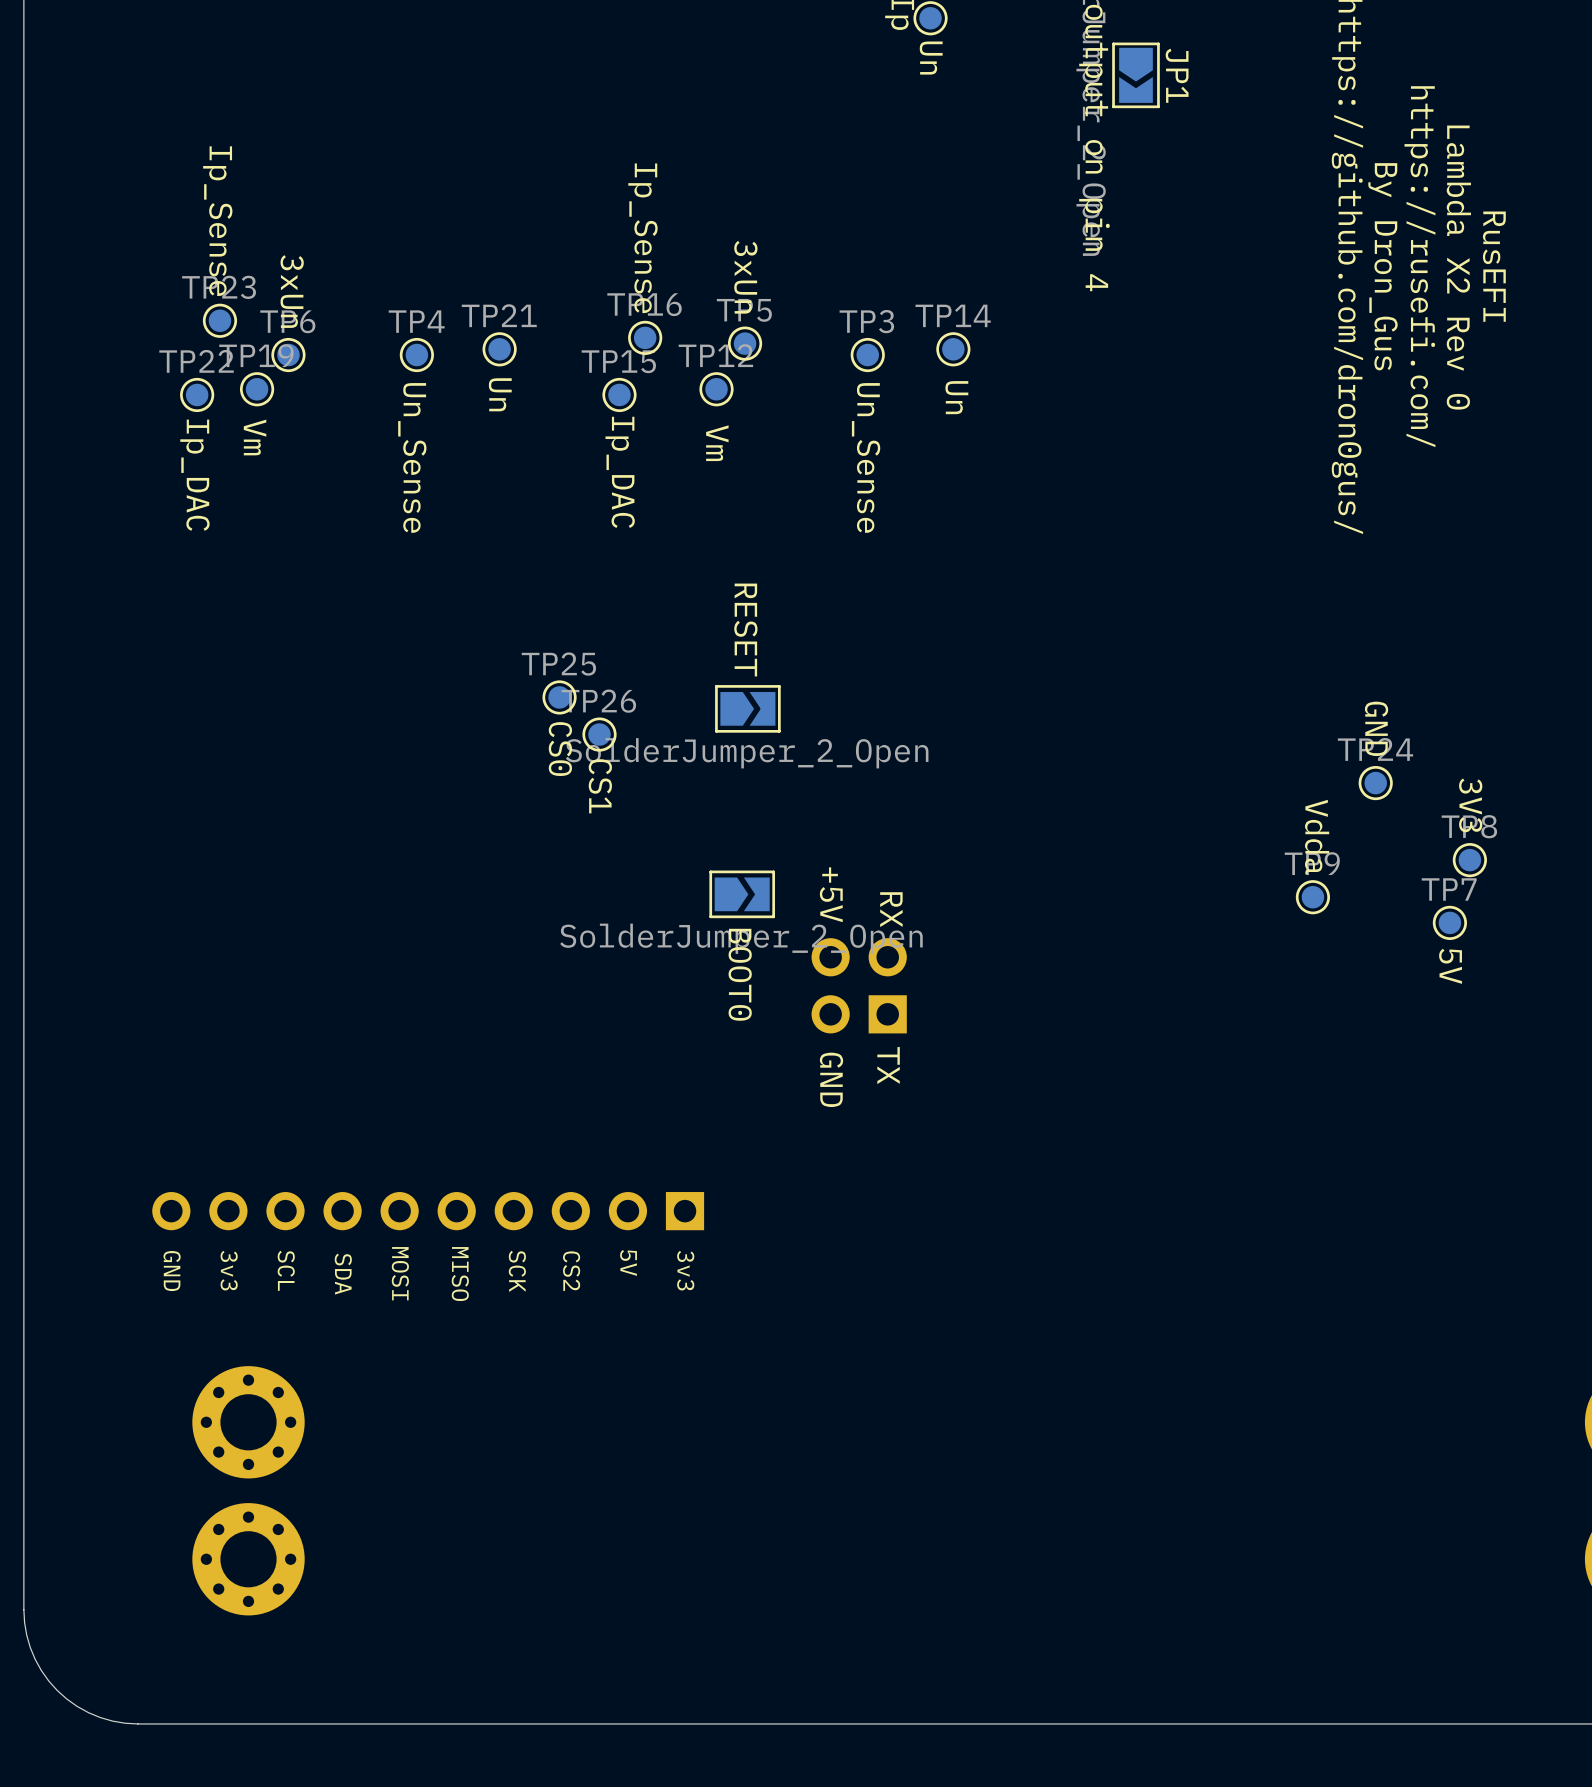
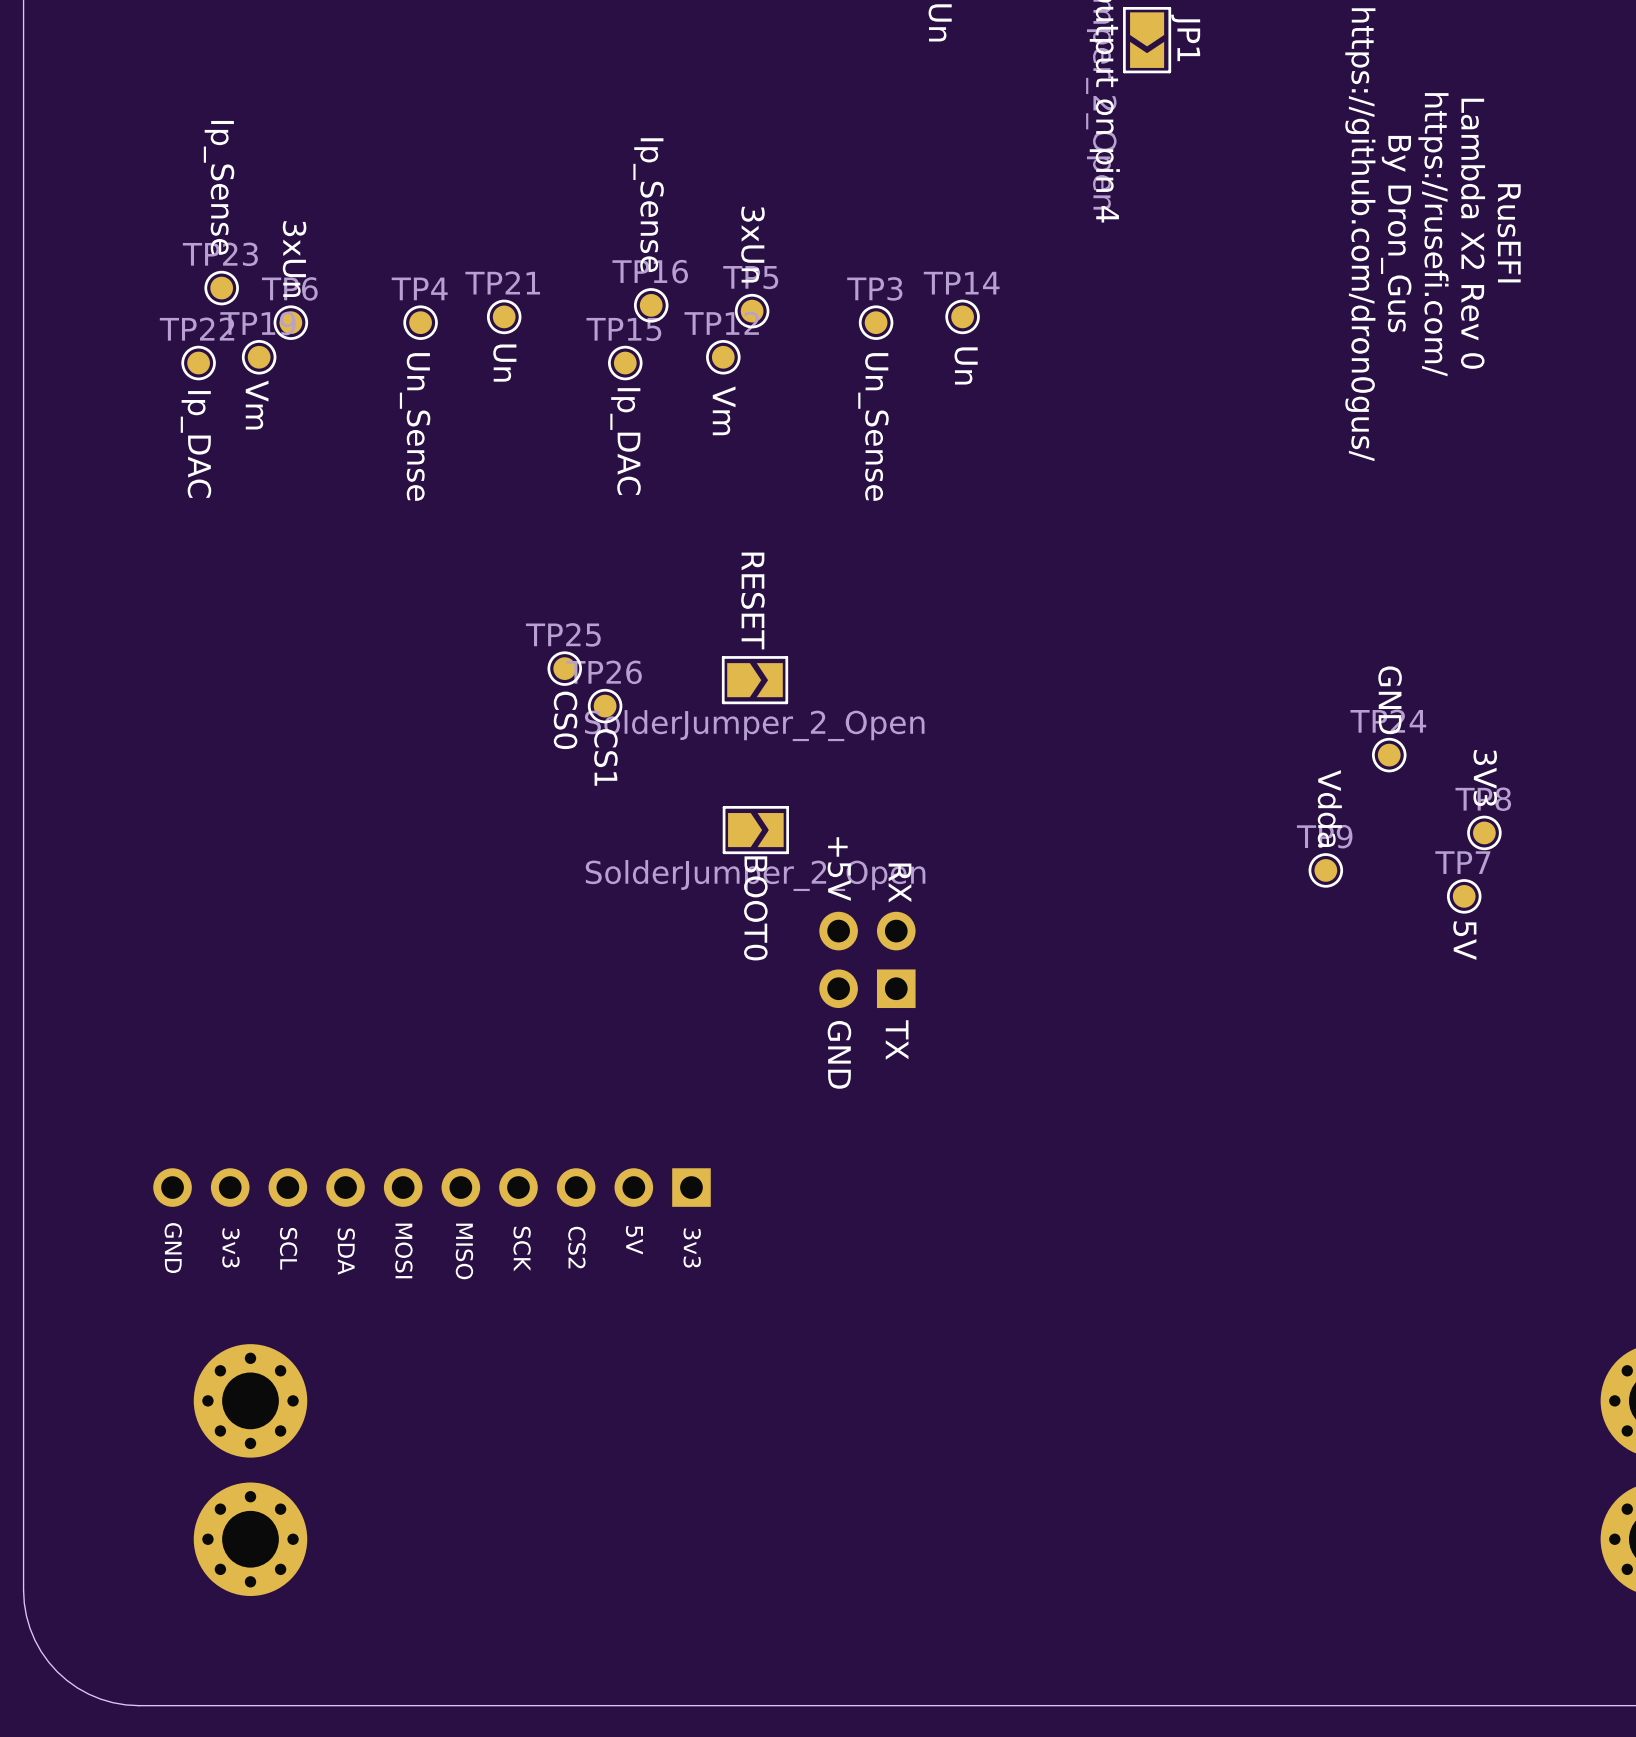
part position: (742, 894) -> (755, 830)
text position: BOOT0 (740, 974) -> BOOT0 (755, 908)

